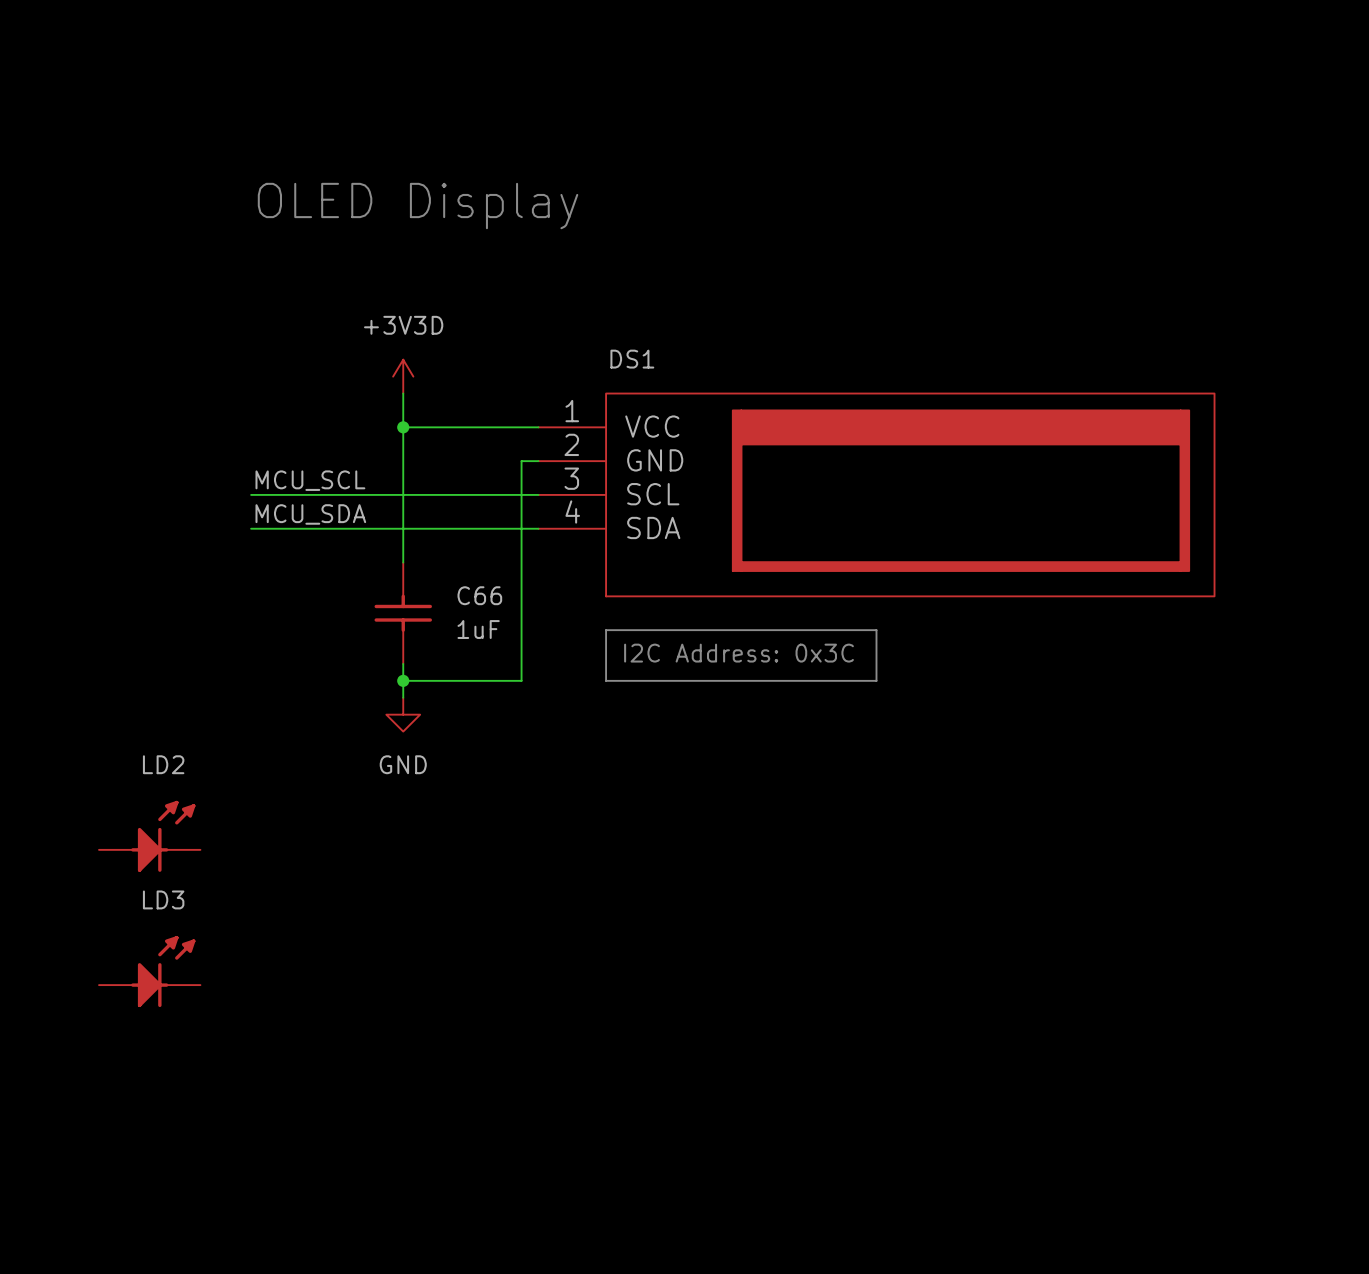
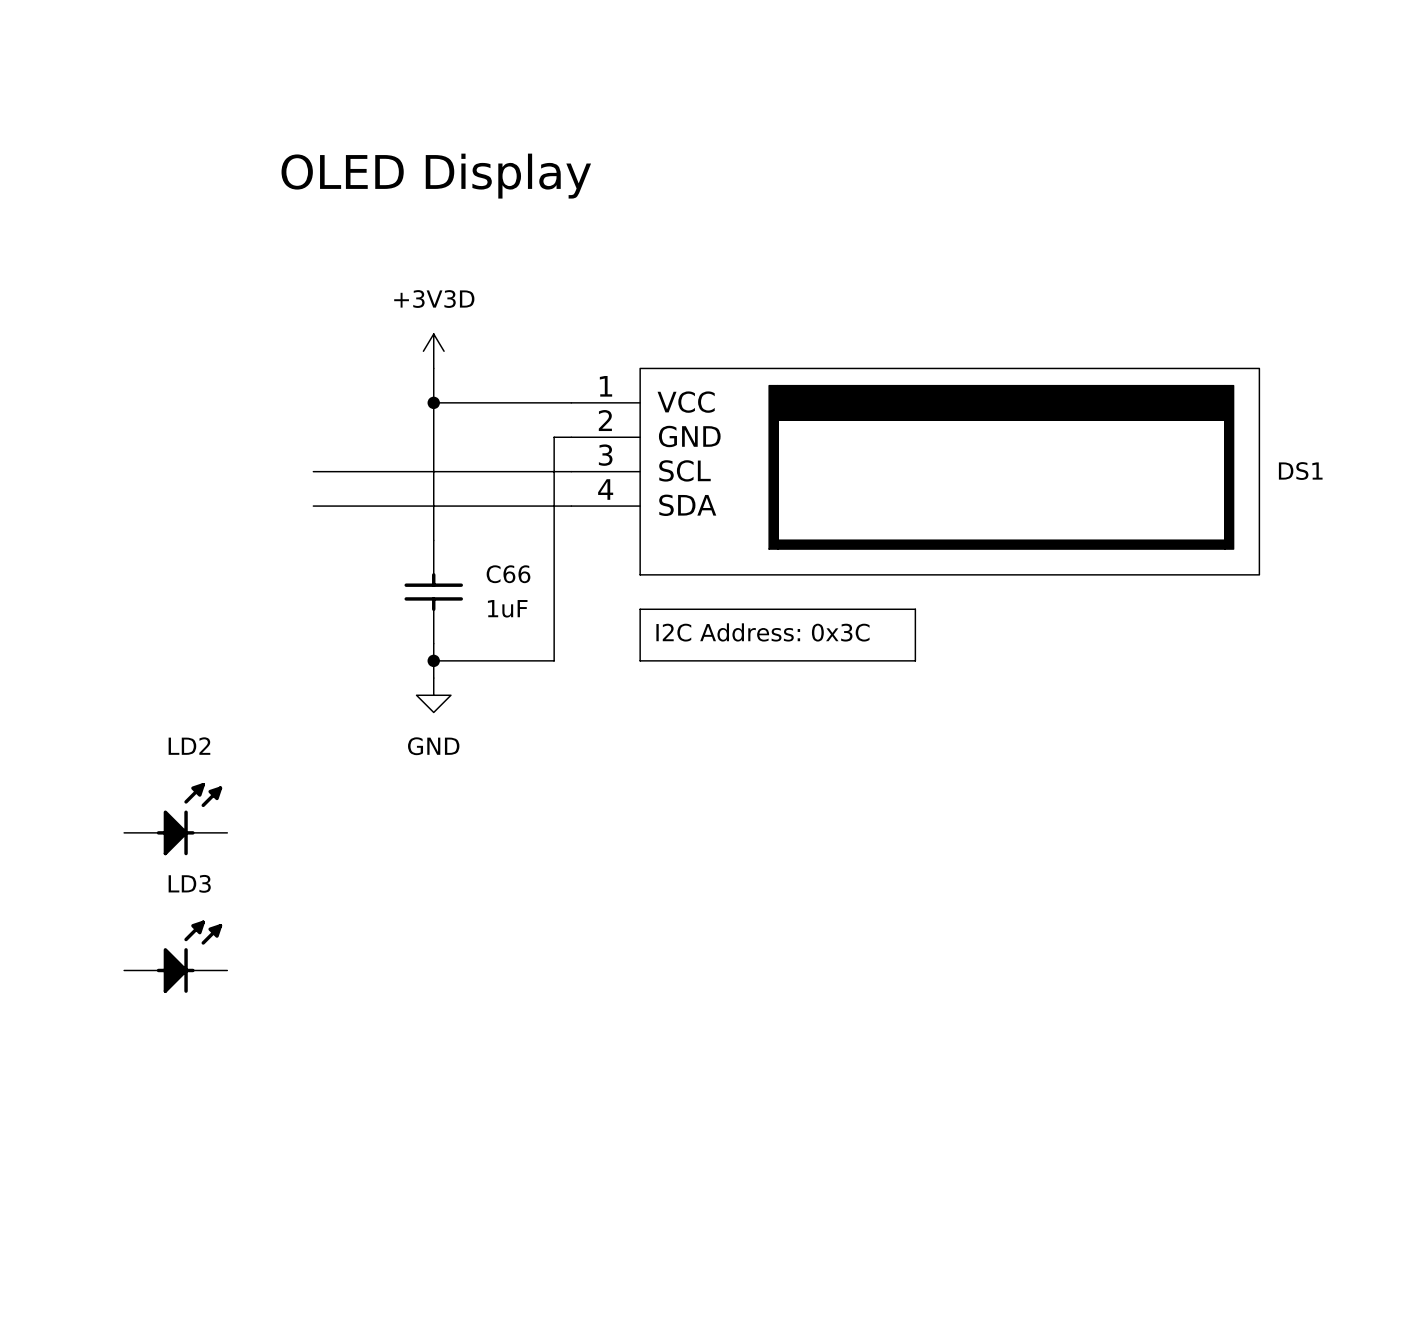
DS1 name position: DS1 (632, 359) -> DS1 (1300, 471)
label: MCU_SCL (310, 480) -> none
wire: (251, 494) (284, 494) -> none
label: MCU_SDA (310, 514) -> none
wire: (251, 528) (284, 528) -> none

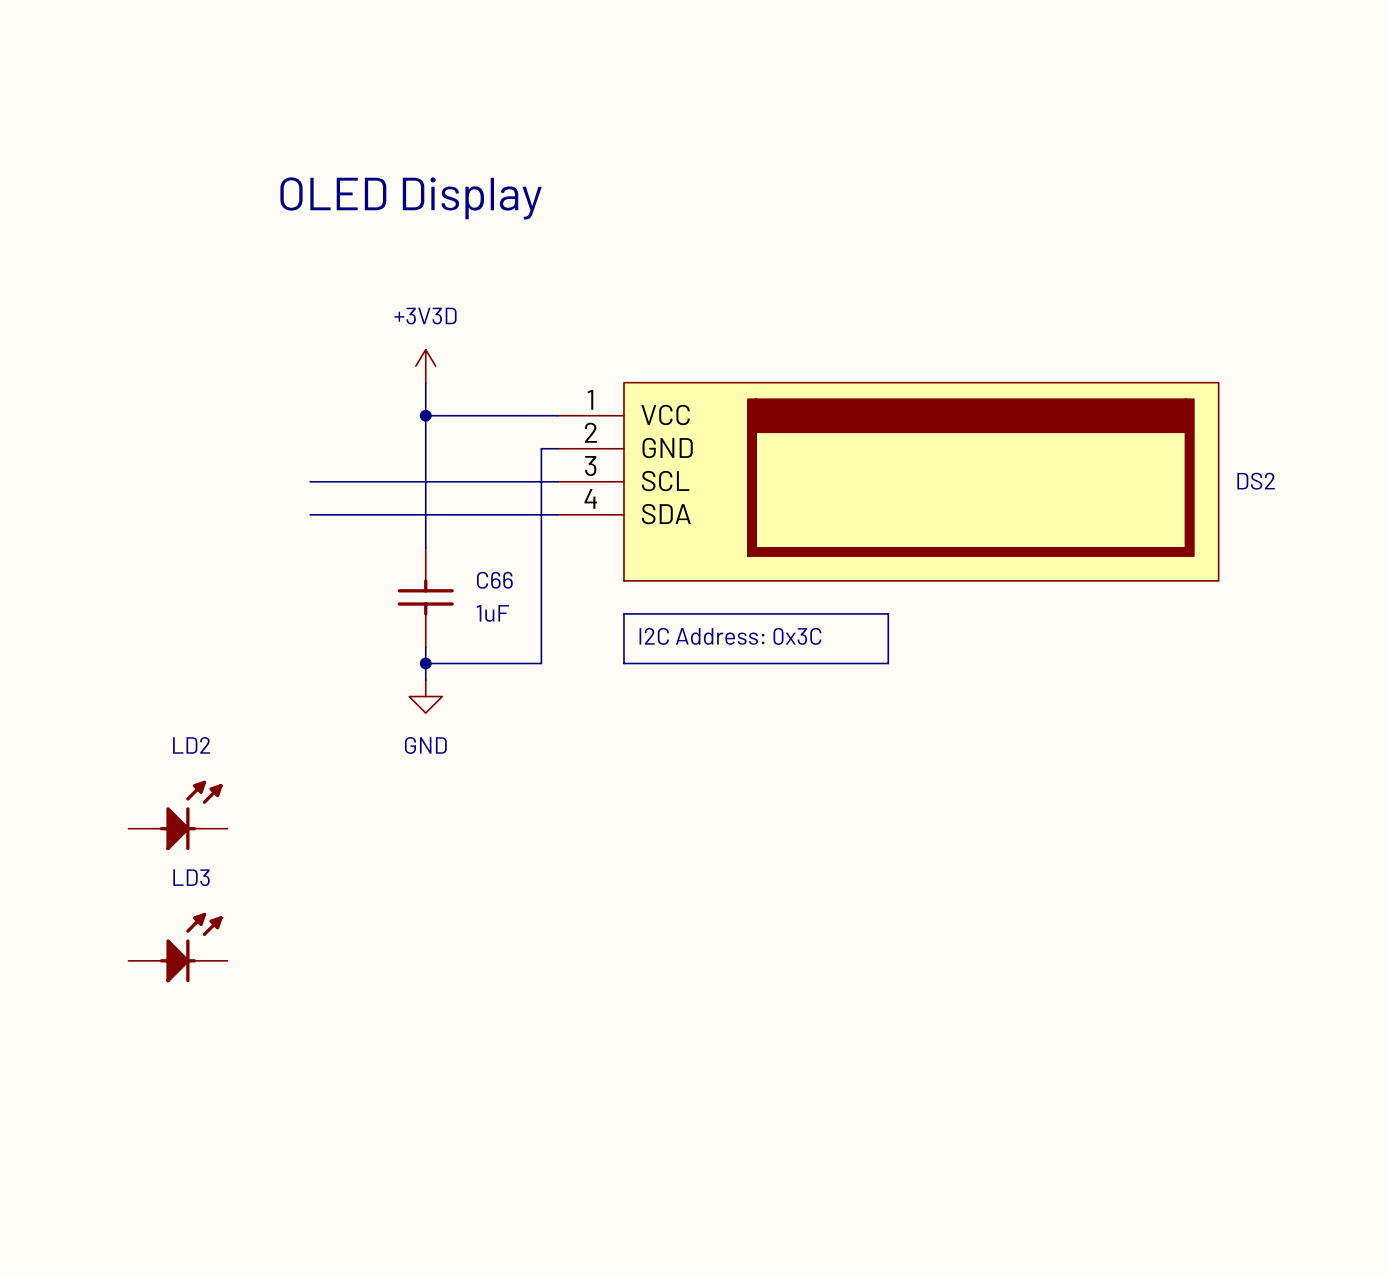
DS1 name: DS1 (1300, 471) -> DS2 (1256, 481)

